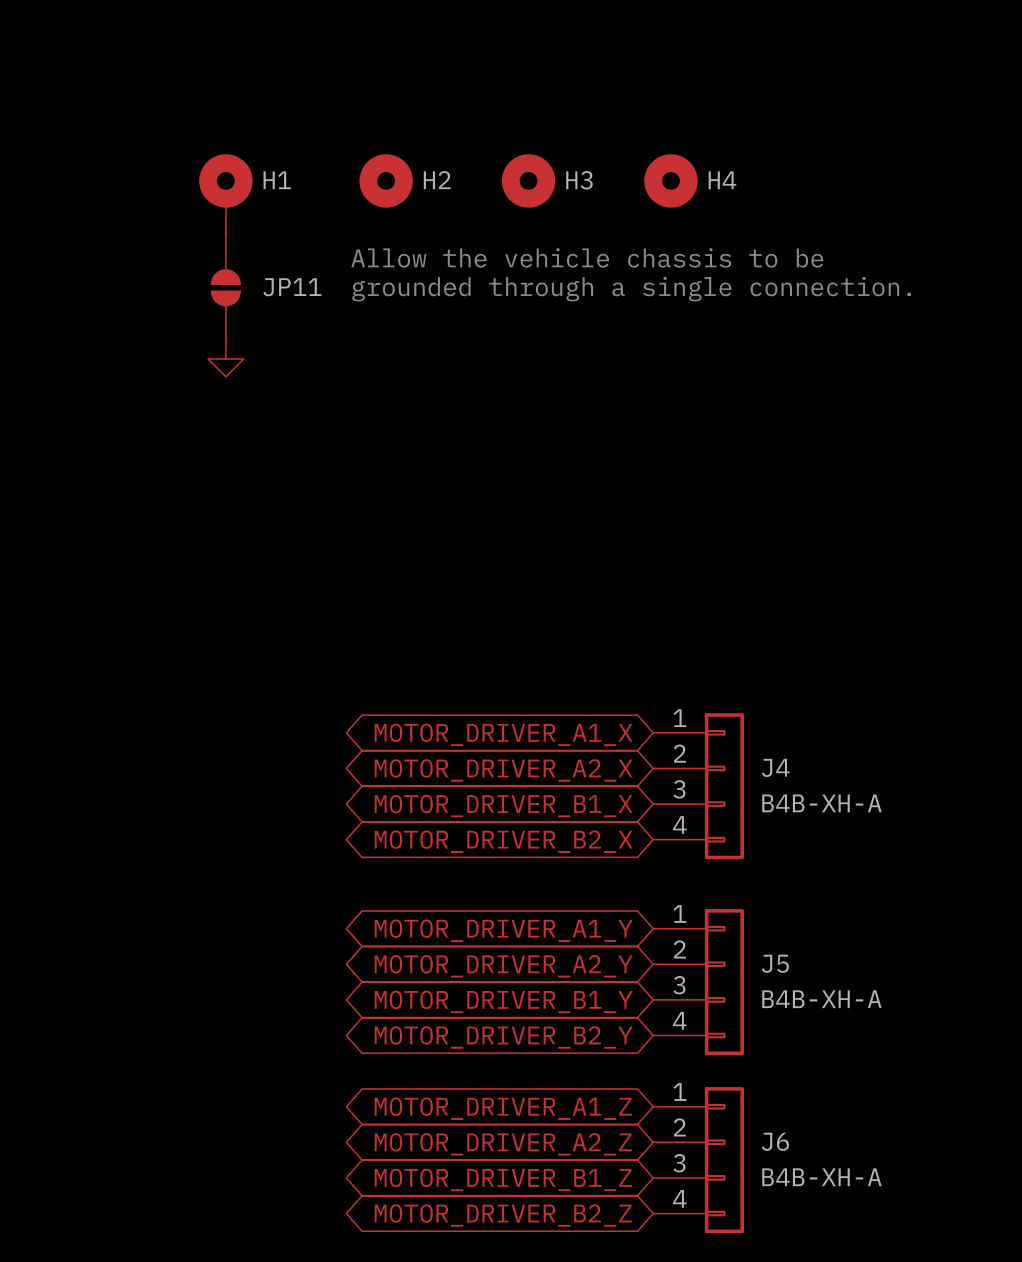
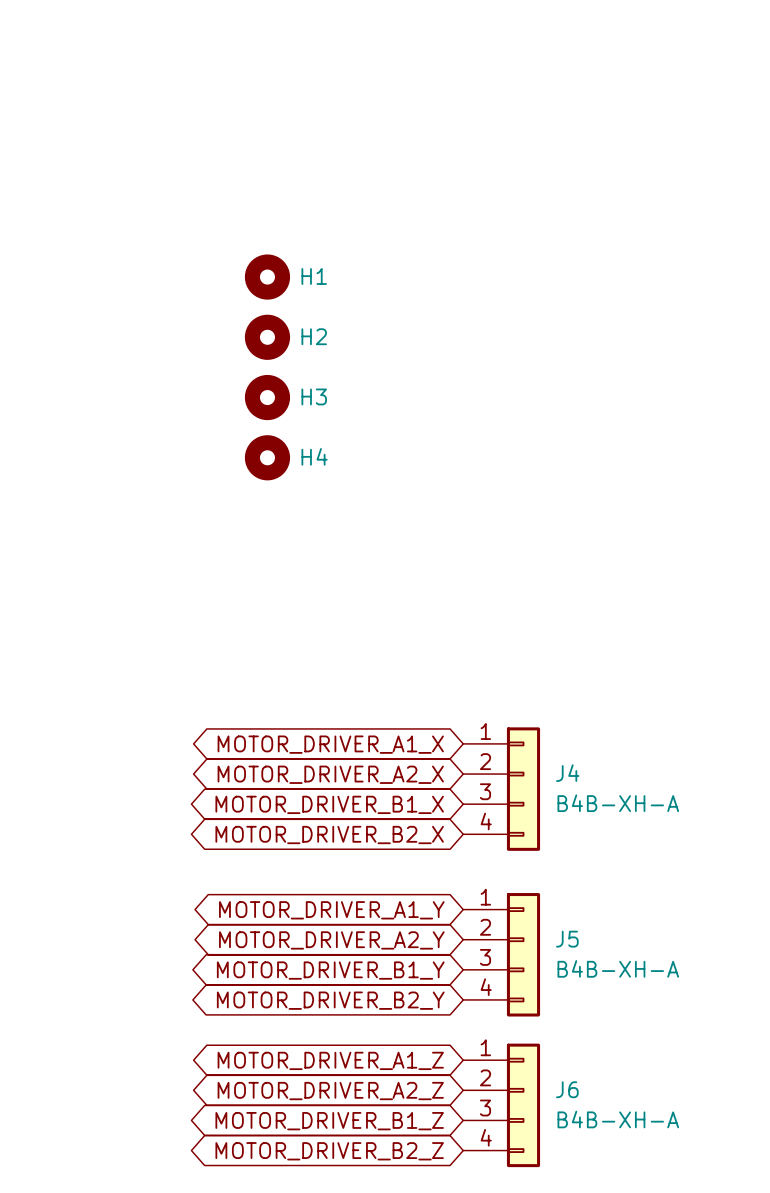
H1 symbol: [199, 154, 253, 235] -> [244, 254, 291, 300]
H2 position: (386, 180) -> (267, 337)
H3 position: (528, 180) -> (267, 397)
H4 position: (670, 180) -> (267, 457)
text: Allow the vehicle chassis to be (587, 257) -> none
JP11: (225, 287) -> none
text: grounded through a single connection. (631, 289) -> none
power symbol: (225, 358) -> none

